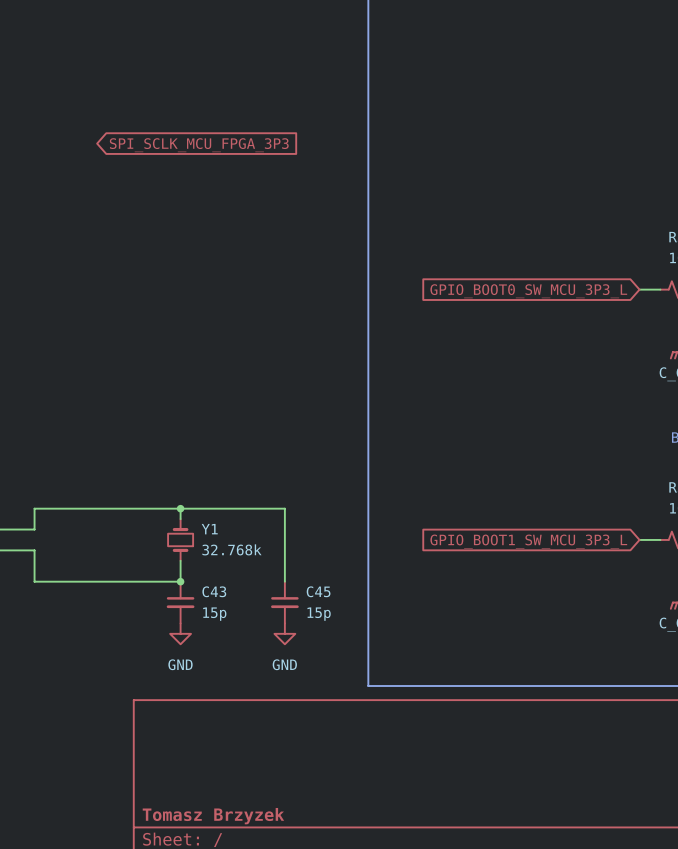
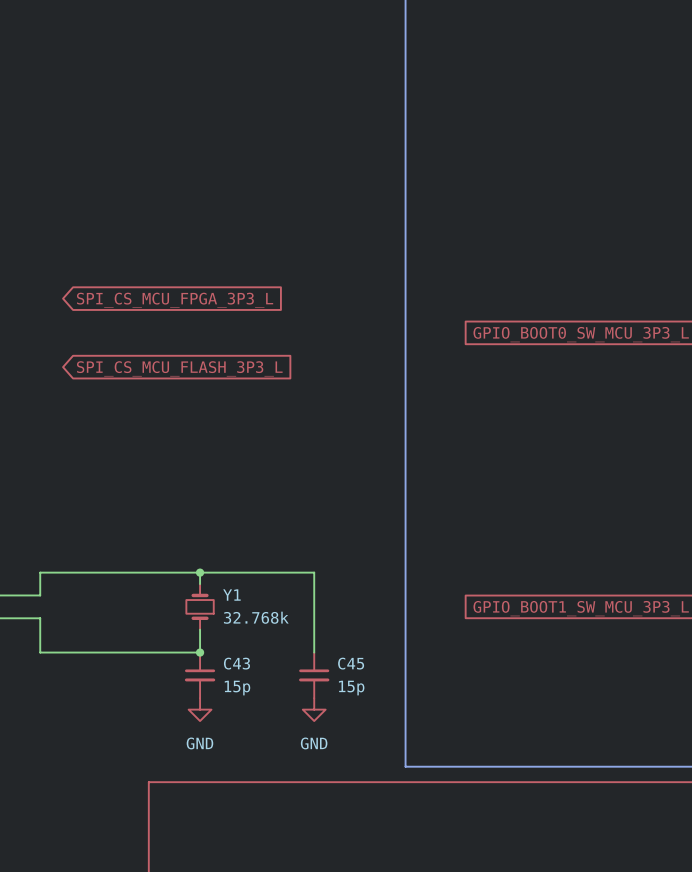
global label: SPI_SCLK_MCU_FPGA_3P3 (199, 145) -> none
global label: none -> SPI_CS_MCU_FPGA_3P3_L (175, 300)
global label: none -> SPI_CS_MCU_FLASH_3P3_L (179, 368)

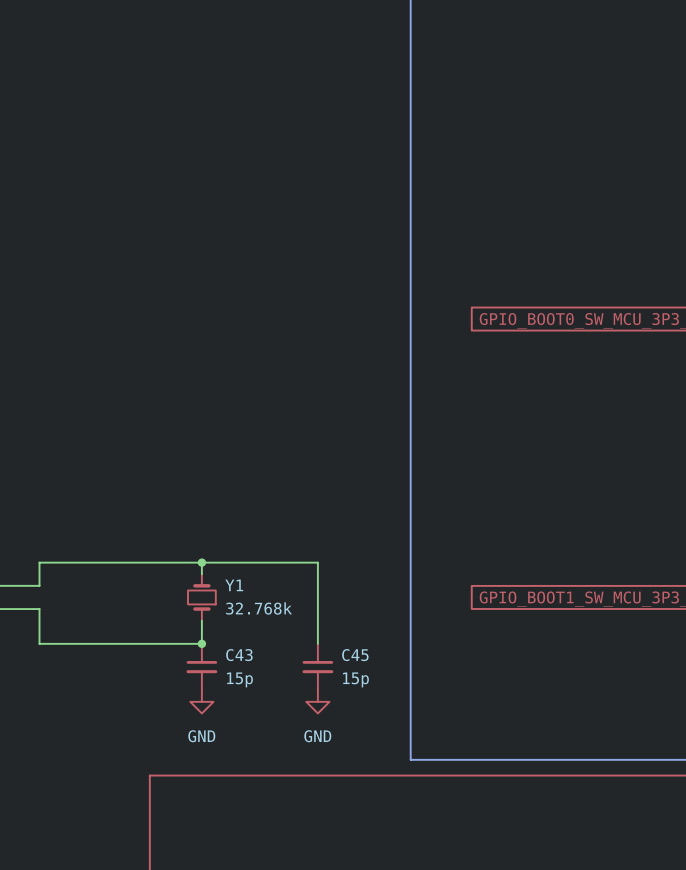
global label: SPI_CS_MCU_FPGA_3P3_L (175, 300) -> none
global label: SPI_CS_MCU_FLASH_3P3_L (179, 368) -> none

